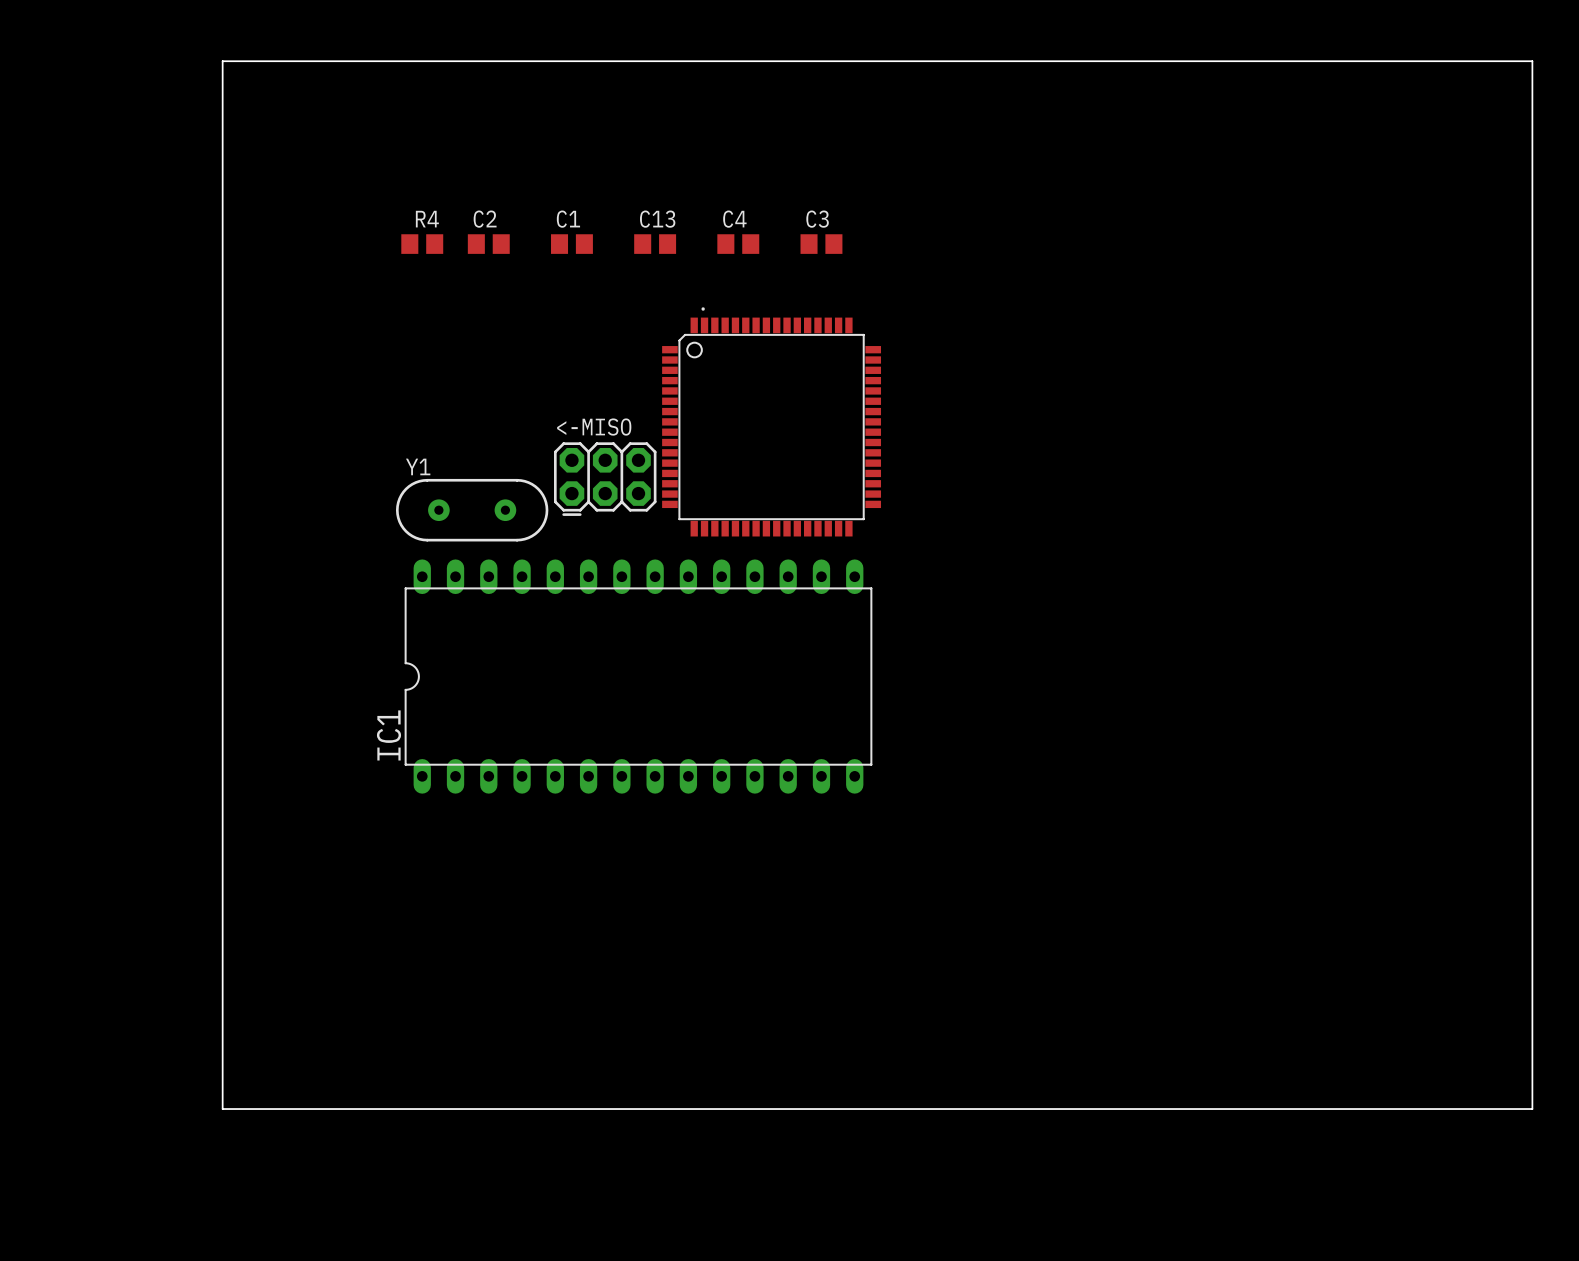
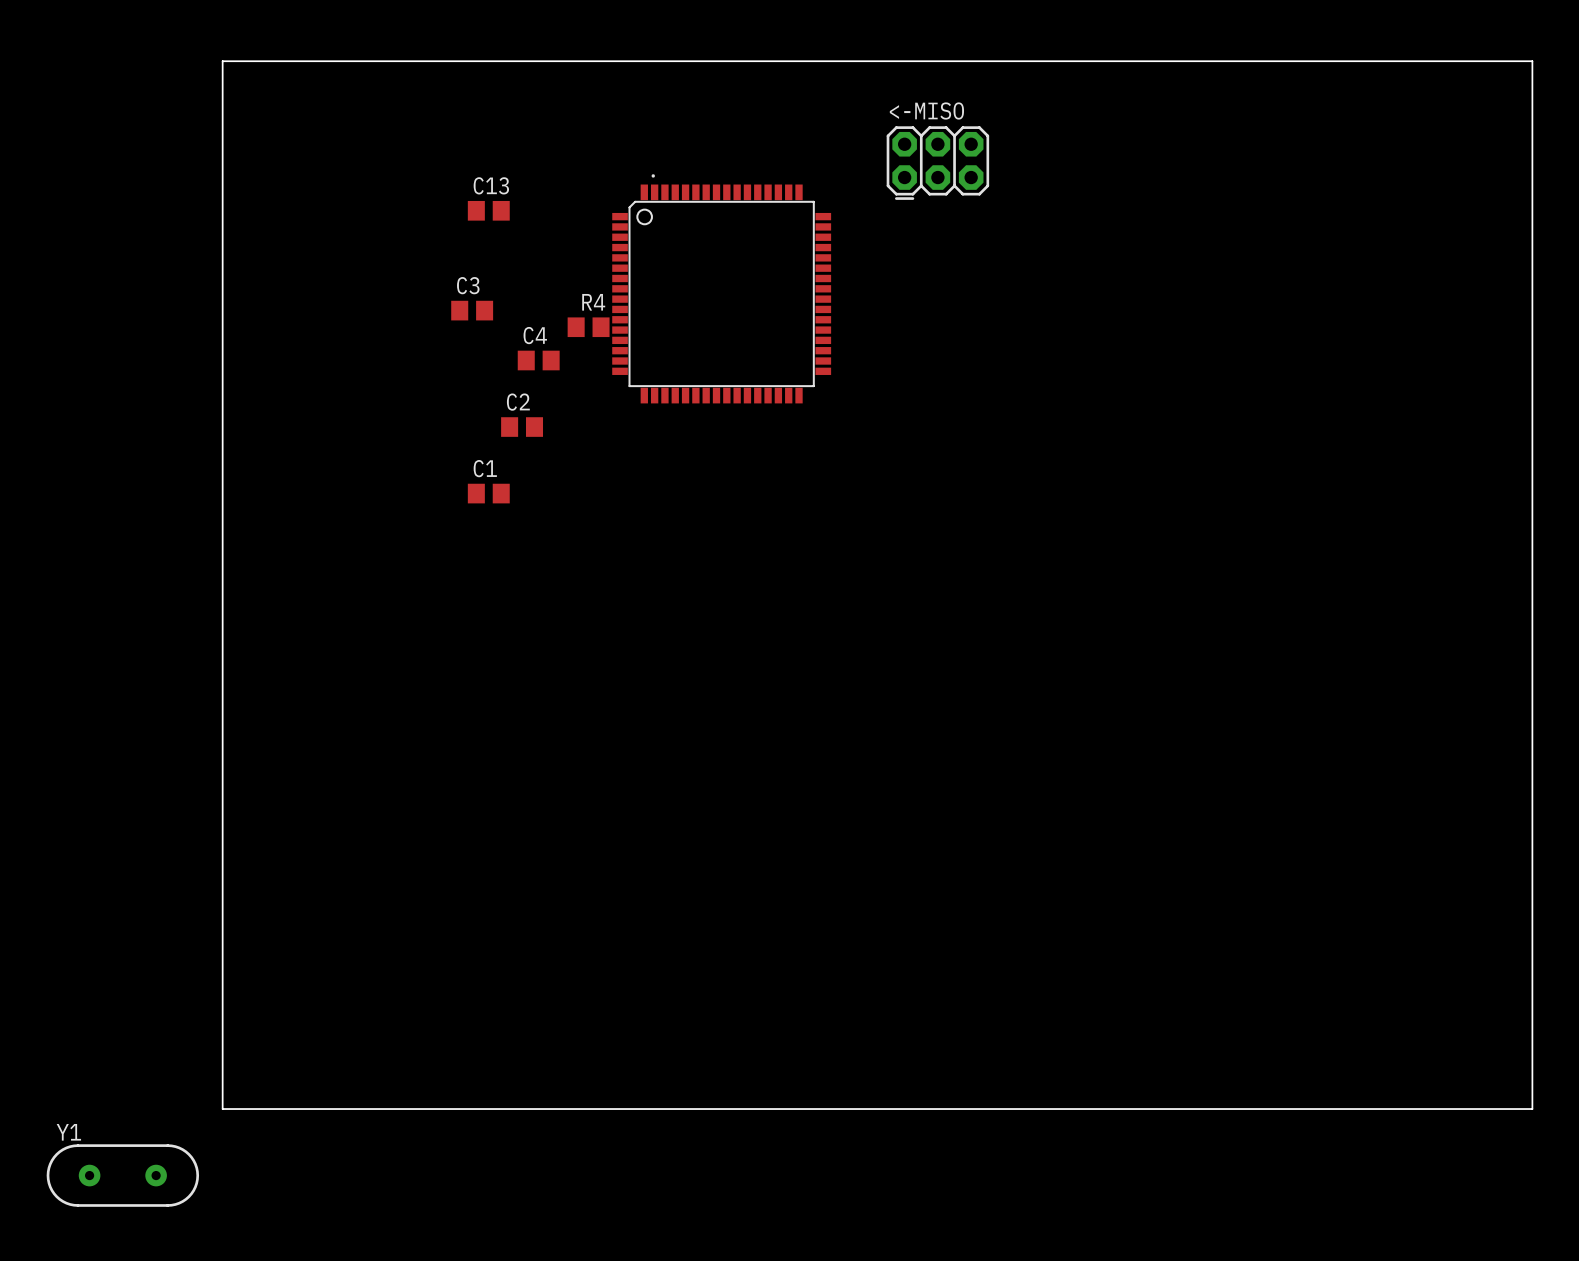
<-MISO: none -> (937, 163)
R4 position: (422, 244) -> (588, 327)
C2 position: (488, 244) -> (522, 427)
C1 position: (571, 244) -> (488, 493)
C13 position: (655, 244) -> (488, 210)
C4 position: (738, 244) -> (538, 360)
C3 position: (821, 244) -> (472, 310)
part position: (771, 427) -> (721, 293)
<-MISO: (605, 479) -> none
Y1 position: (472, 510) -> (122, 1175)
IC1: (638, 676) -> none

